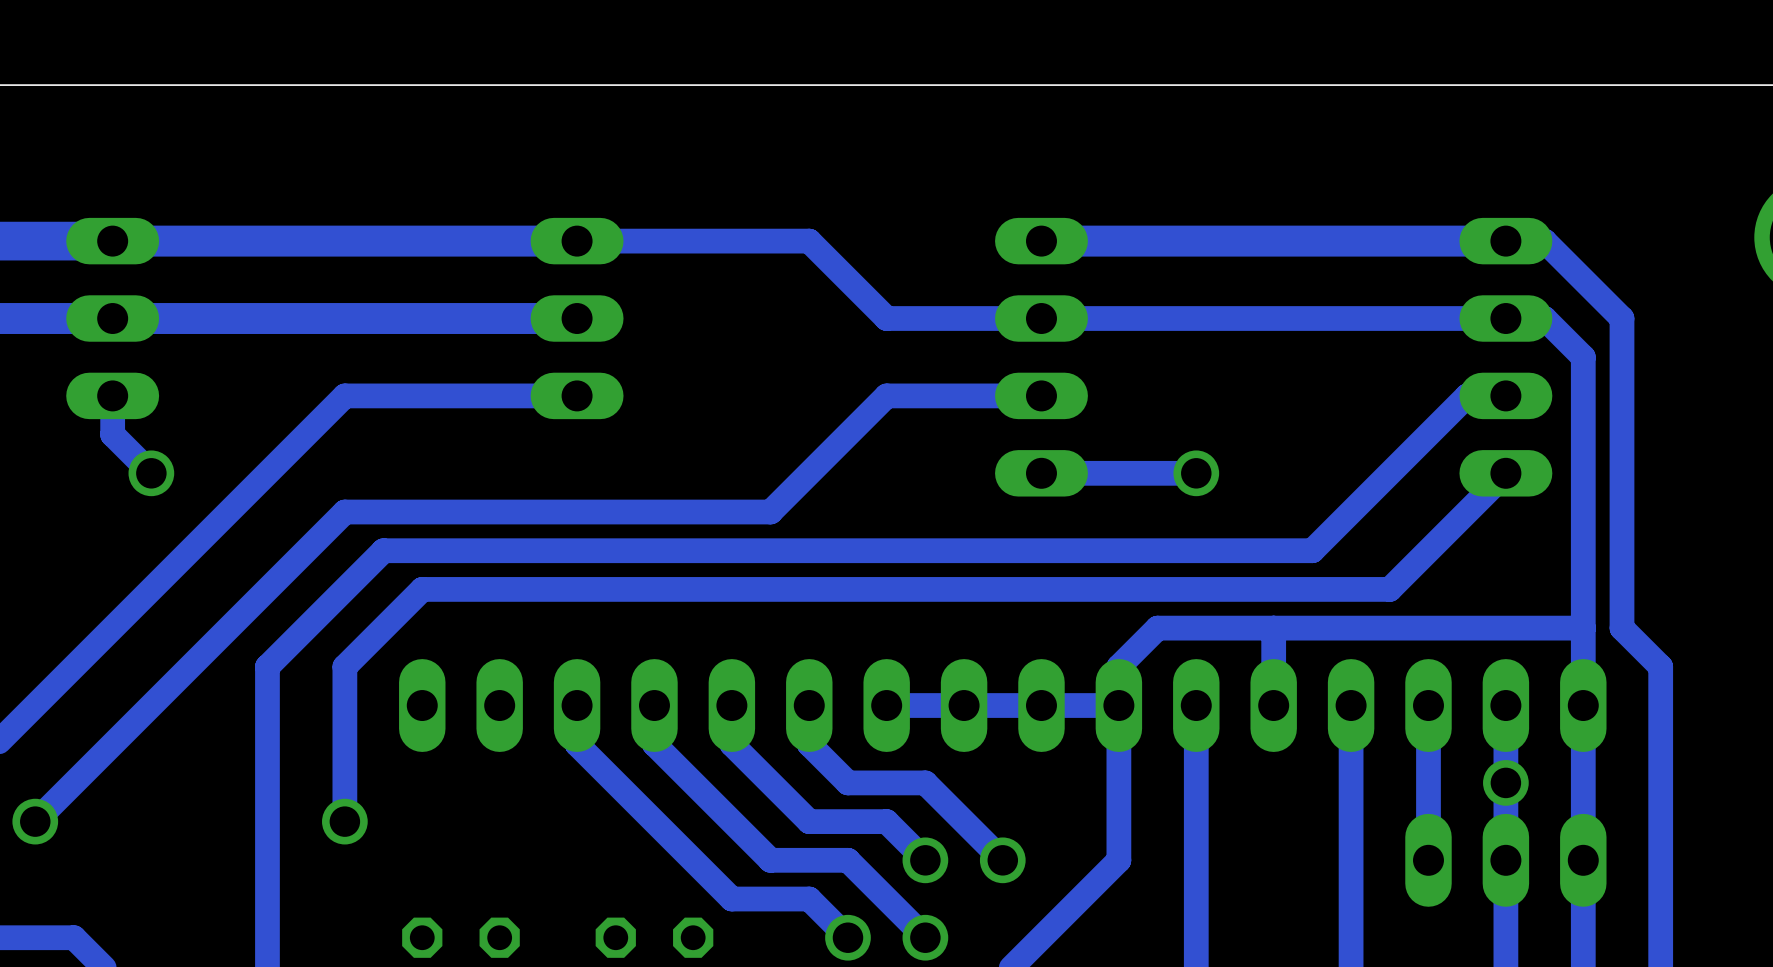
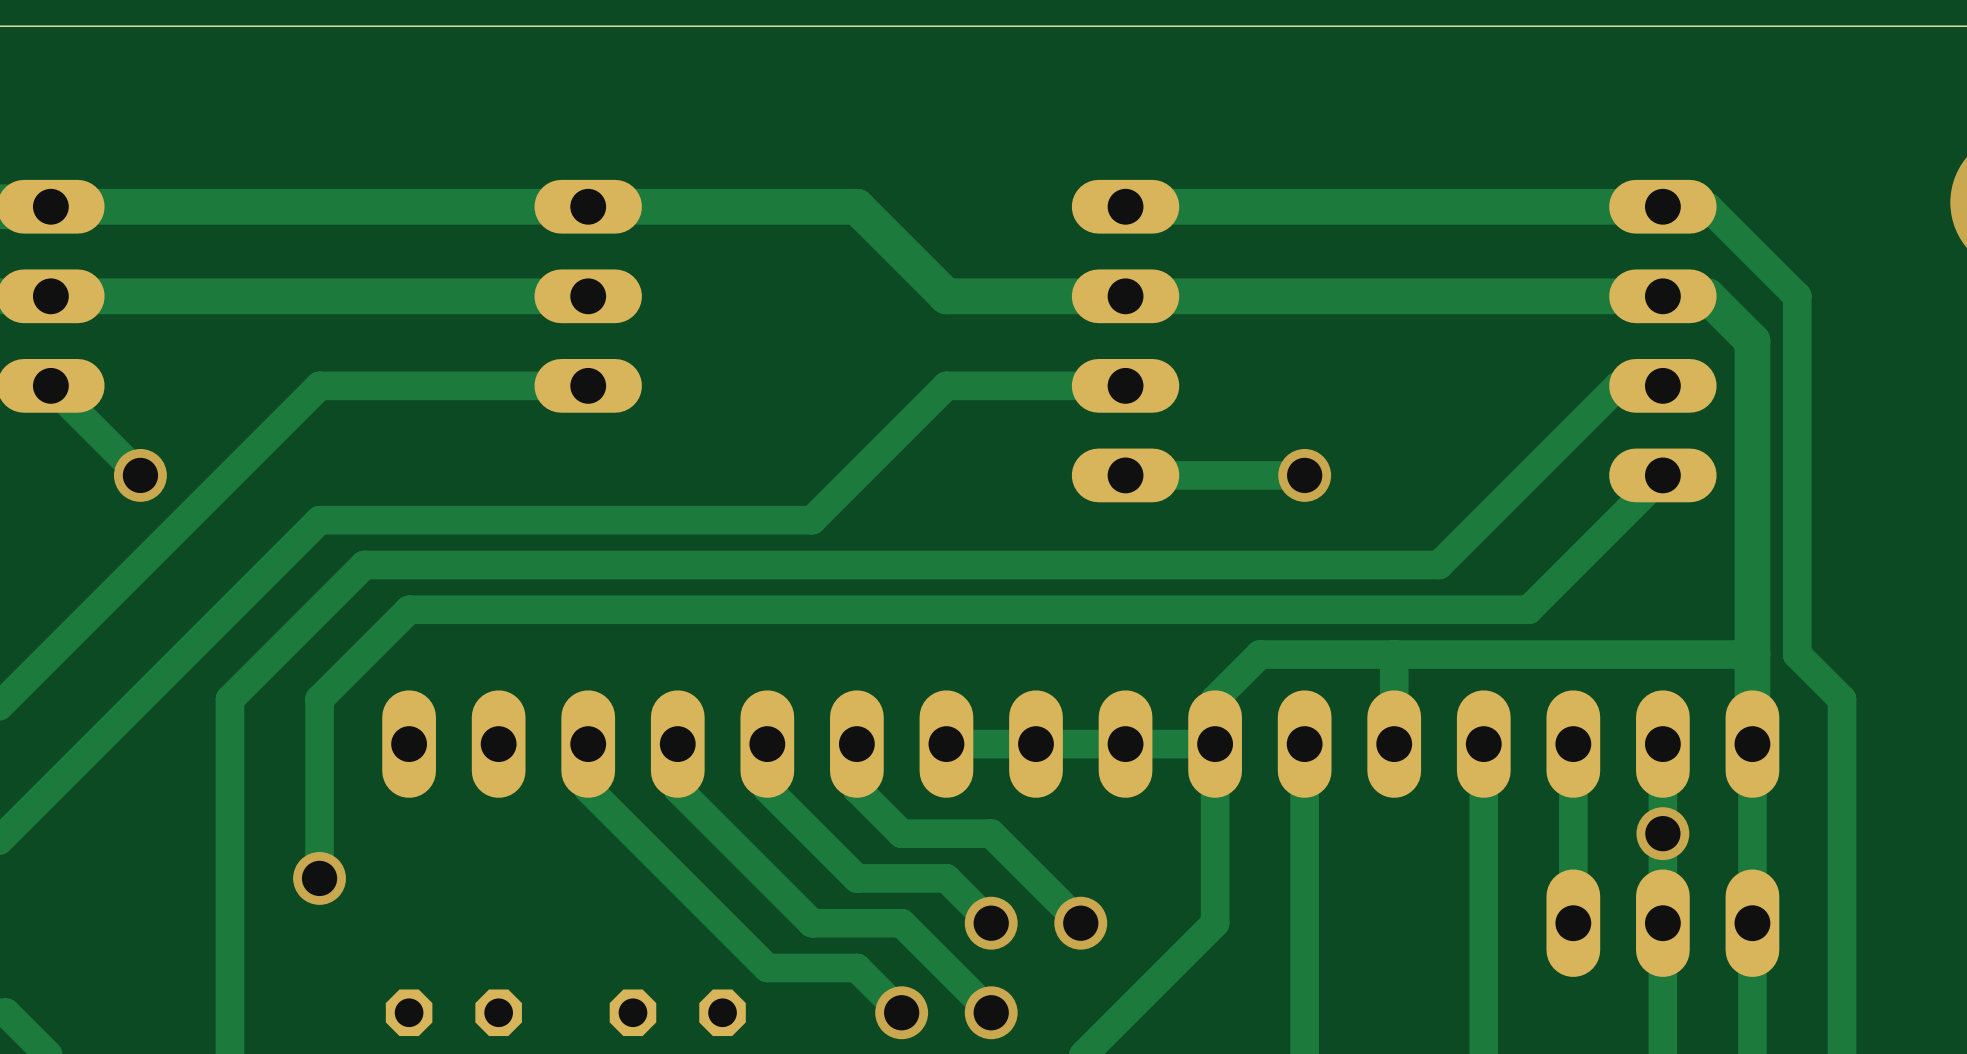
track width: thin (577, 241) (809, 241) (886, 318) (1544, 318) (1583, 357) (1583, 705) -> thick (588, 206) (856, 206) (946, 296) (1707, 296) (1752, 341) (1752, 744)
track: (112, 395) (112, 434) (151, 473) -> (50, 385) (140, 475)
via position: (151, 473) -> (140, 475)

